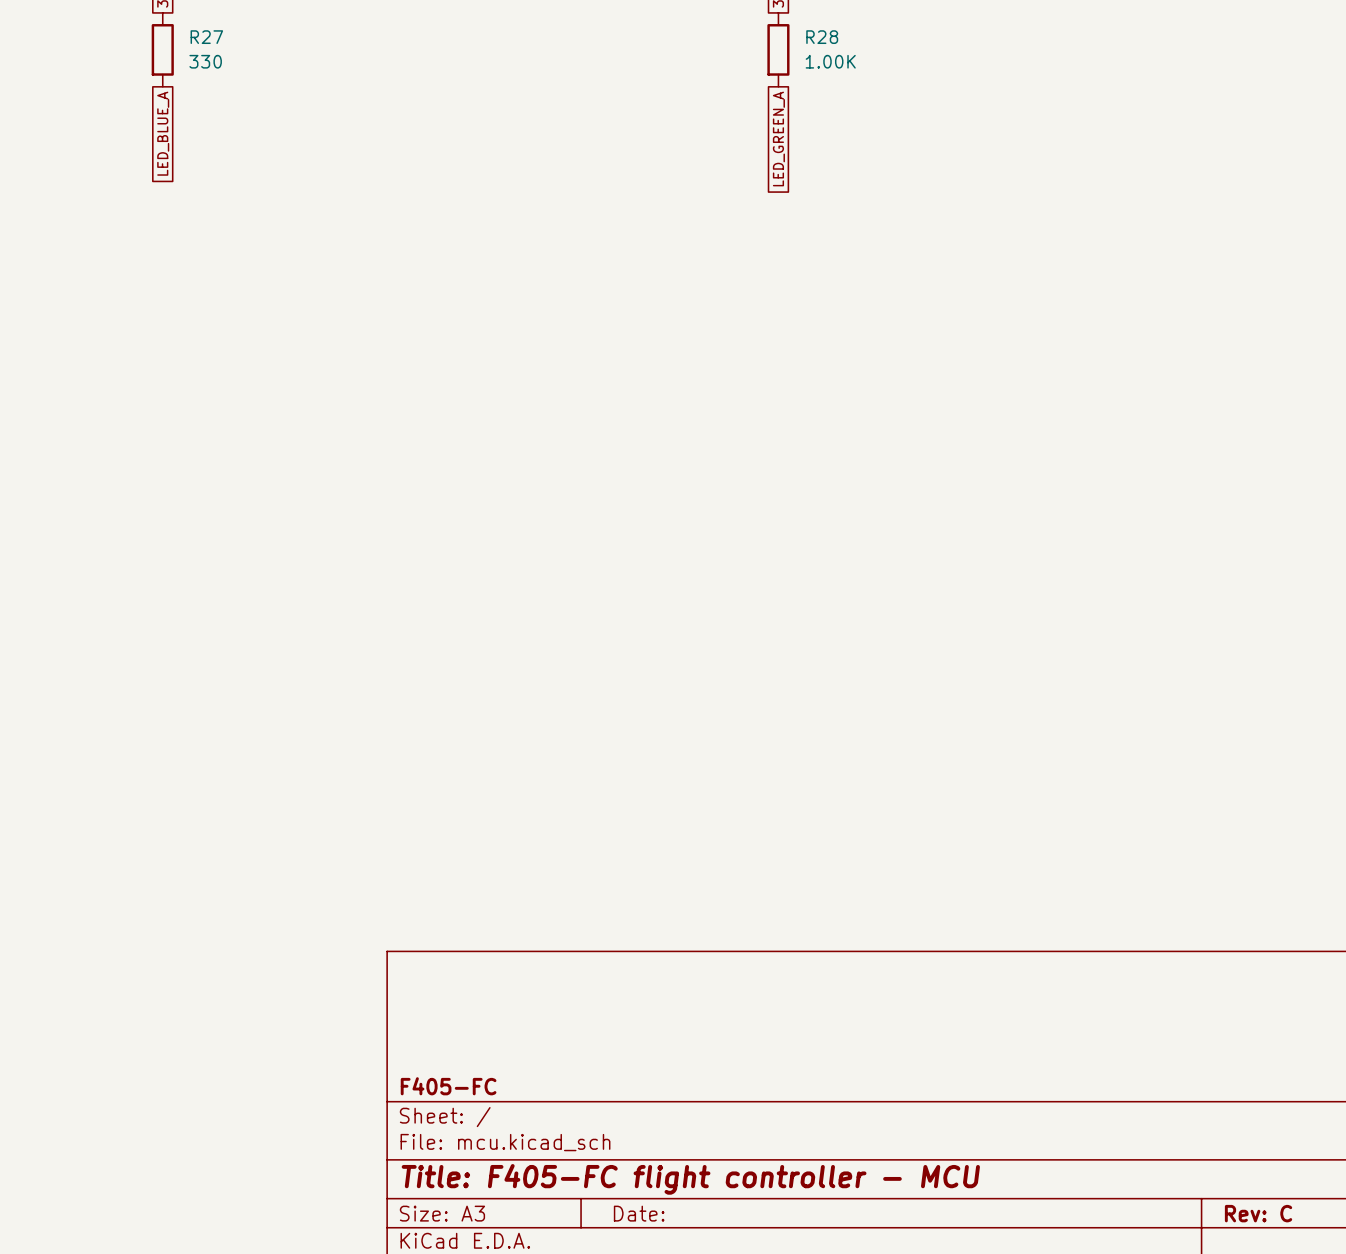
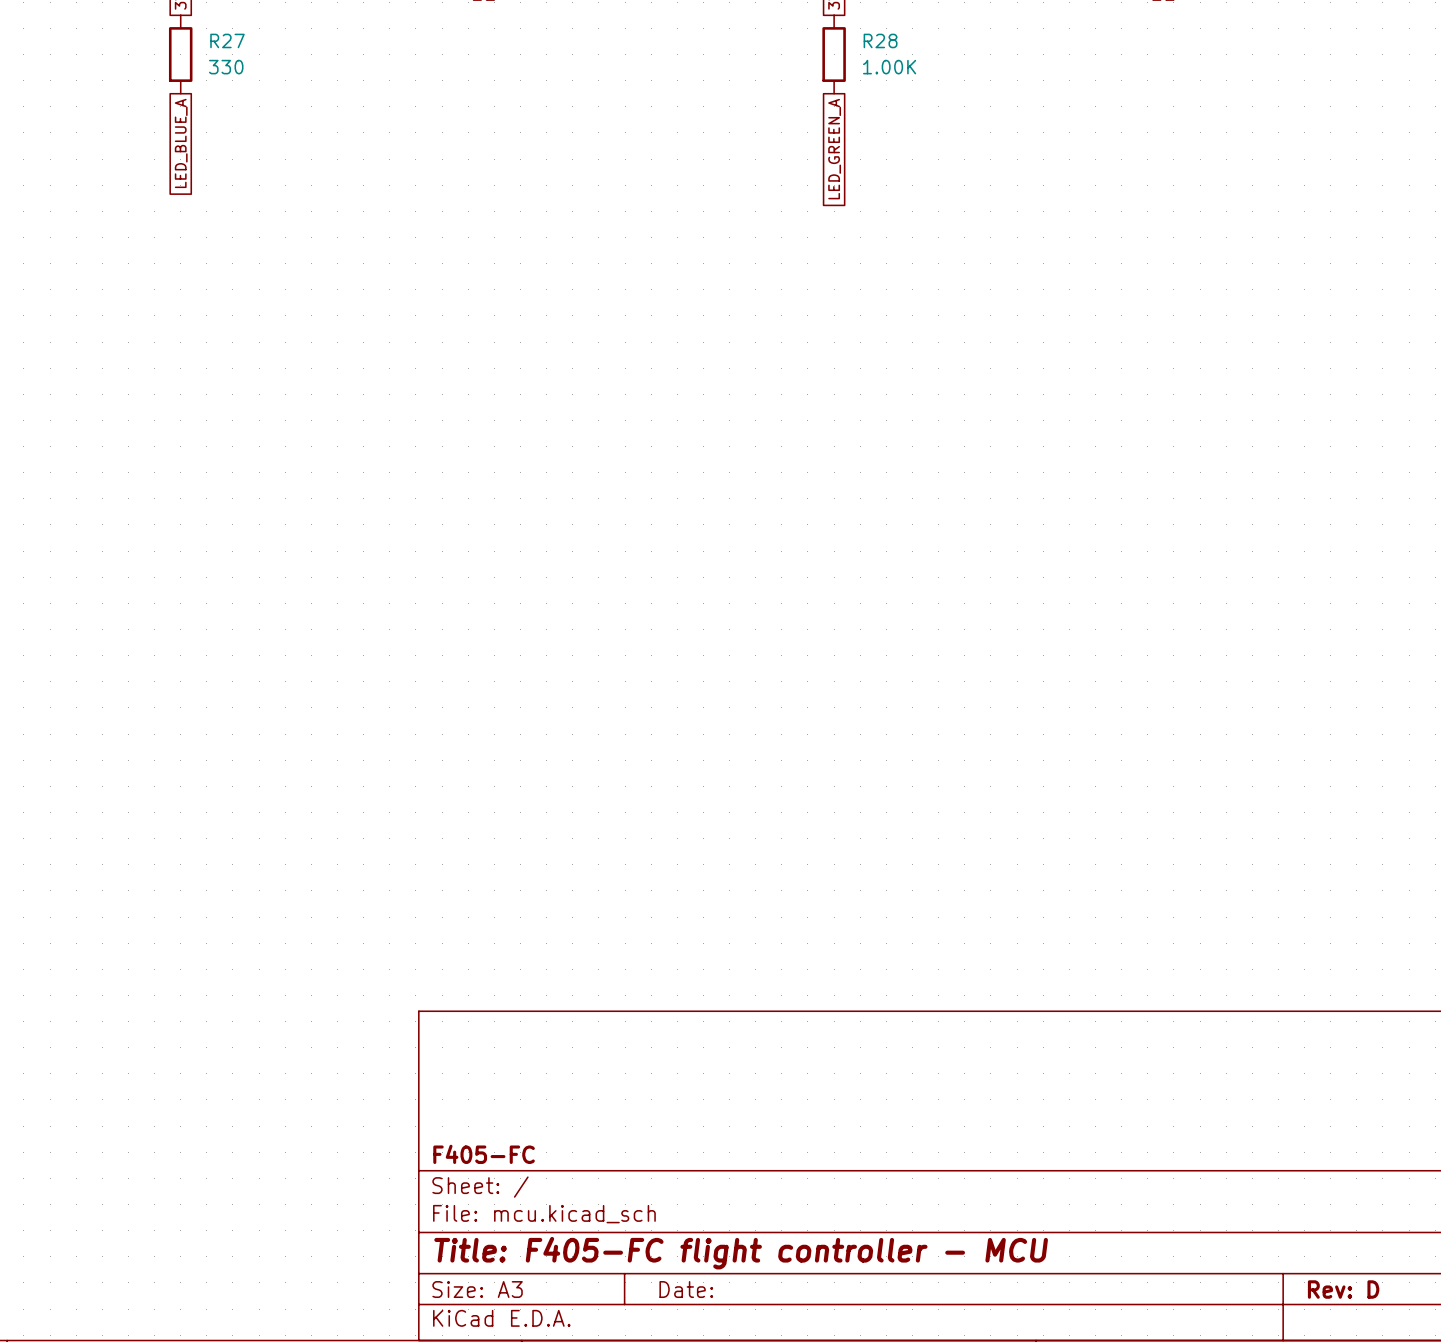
title block: Rev: C (1258, 1213) -> Rev: D (1343, 1289)

